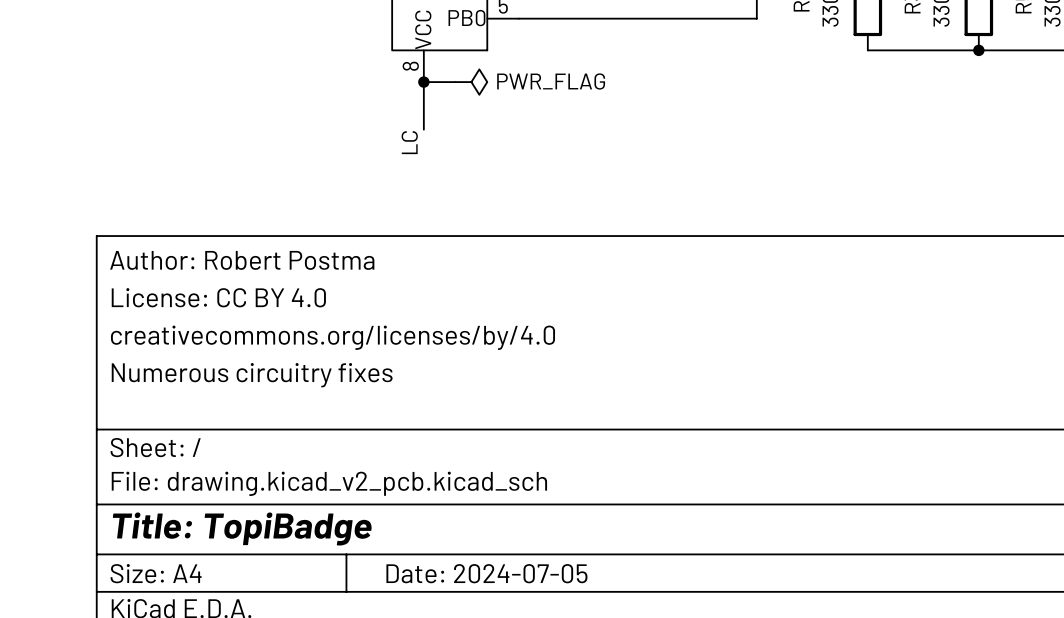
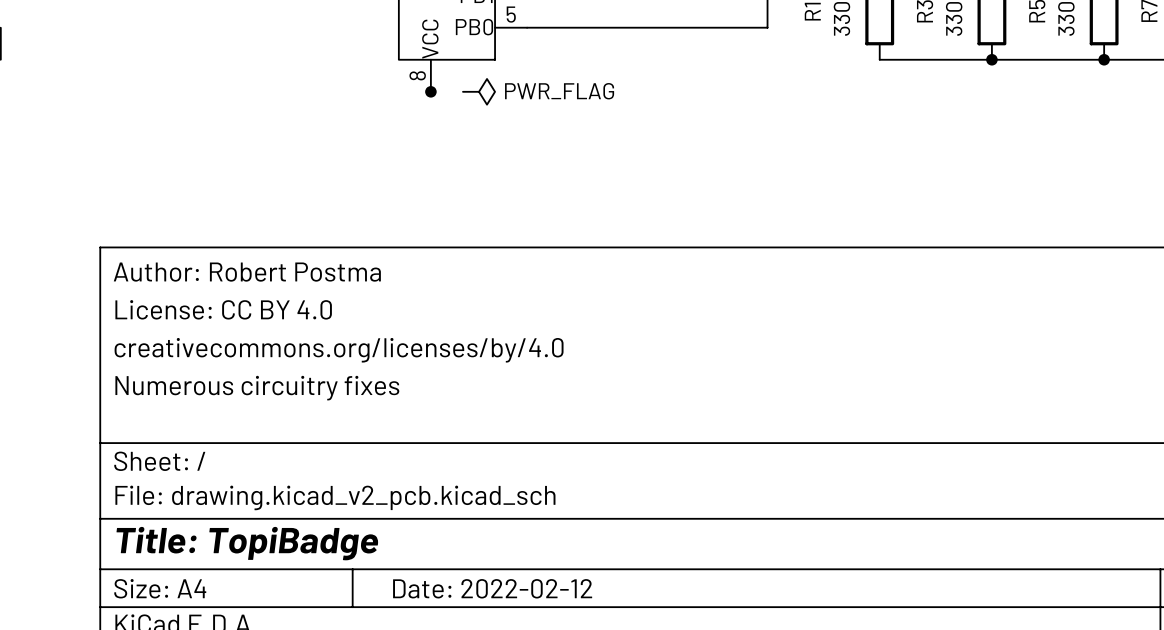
wire: (455, 82) (423, 82) (423, 129) -> none
label: LC (409, 142) -> none
title block: Date: 2024-07-05 (486, 573) -> Date: 2022-02-12 (492, 588)

